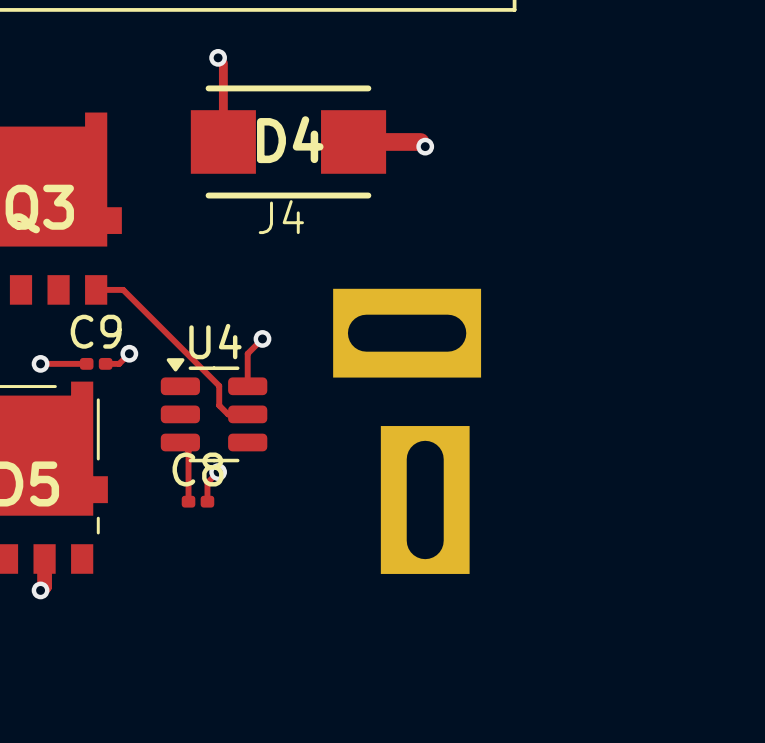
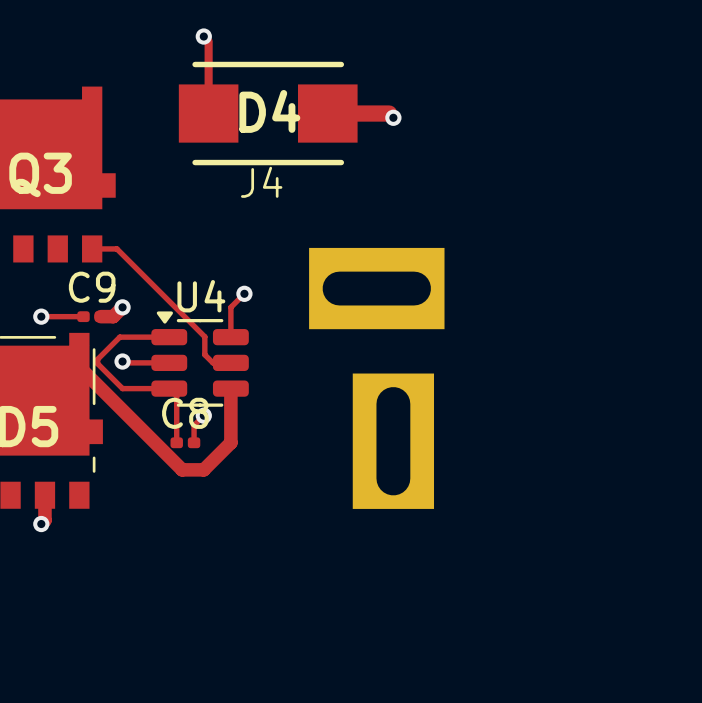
track width: thin (129, 353) (119, 363) (105, 363) -> thick (122, 307) (113, 316) (100, 316)
track: none -> (169, 337) (119, 337) (97, 359) (97, 363) (122, 388) (169, 388)
track: none -> (79, 339) (79, 367) (182, 469) (203, 469) (230, 442) (230, 388)
track: none -> (122, 361) (169, 362)
via: none -> (122, 361)

